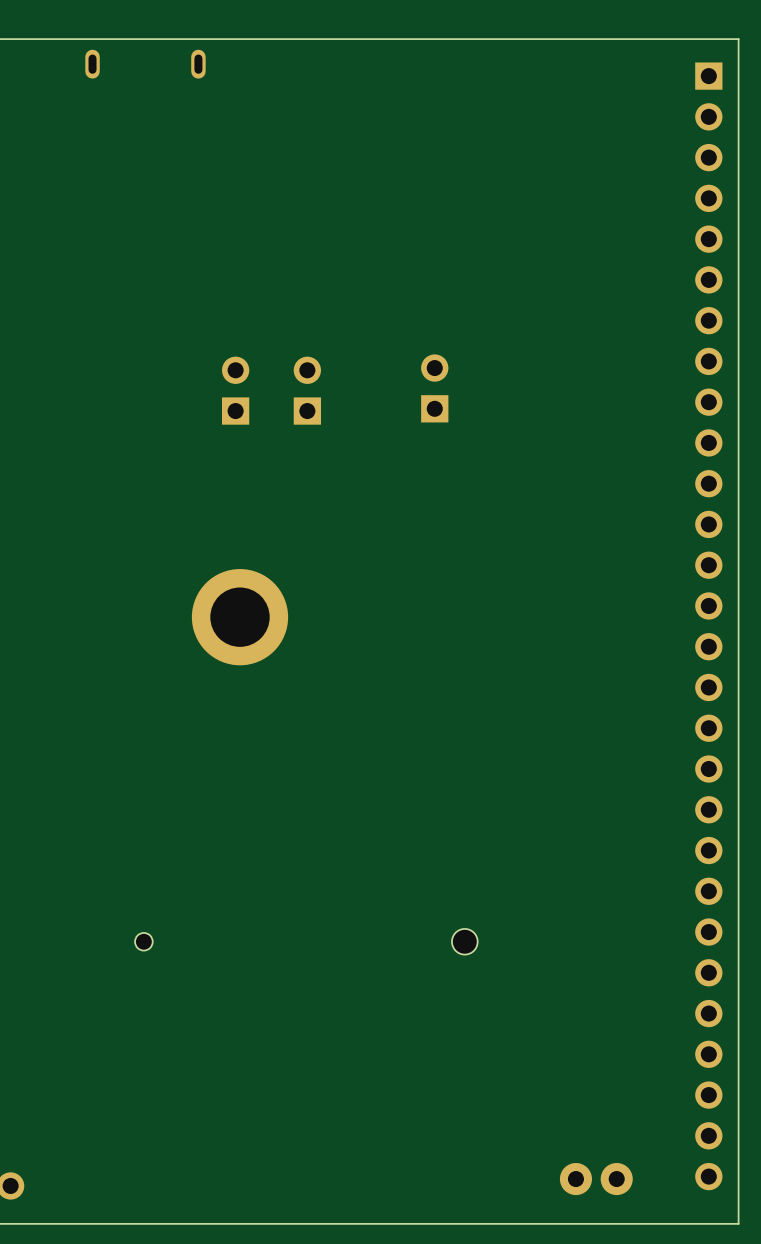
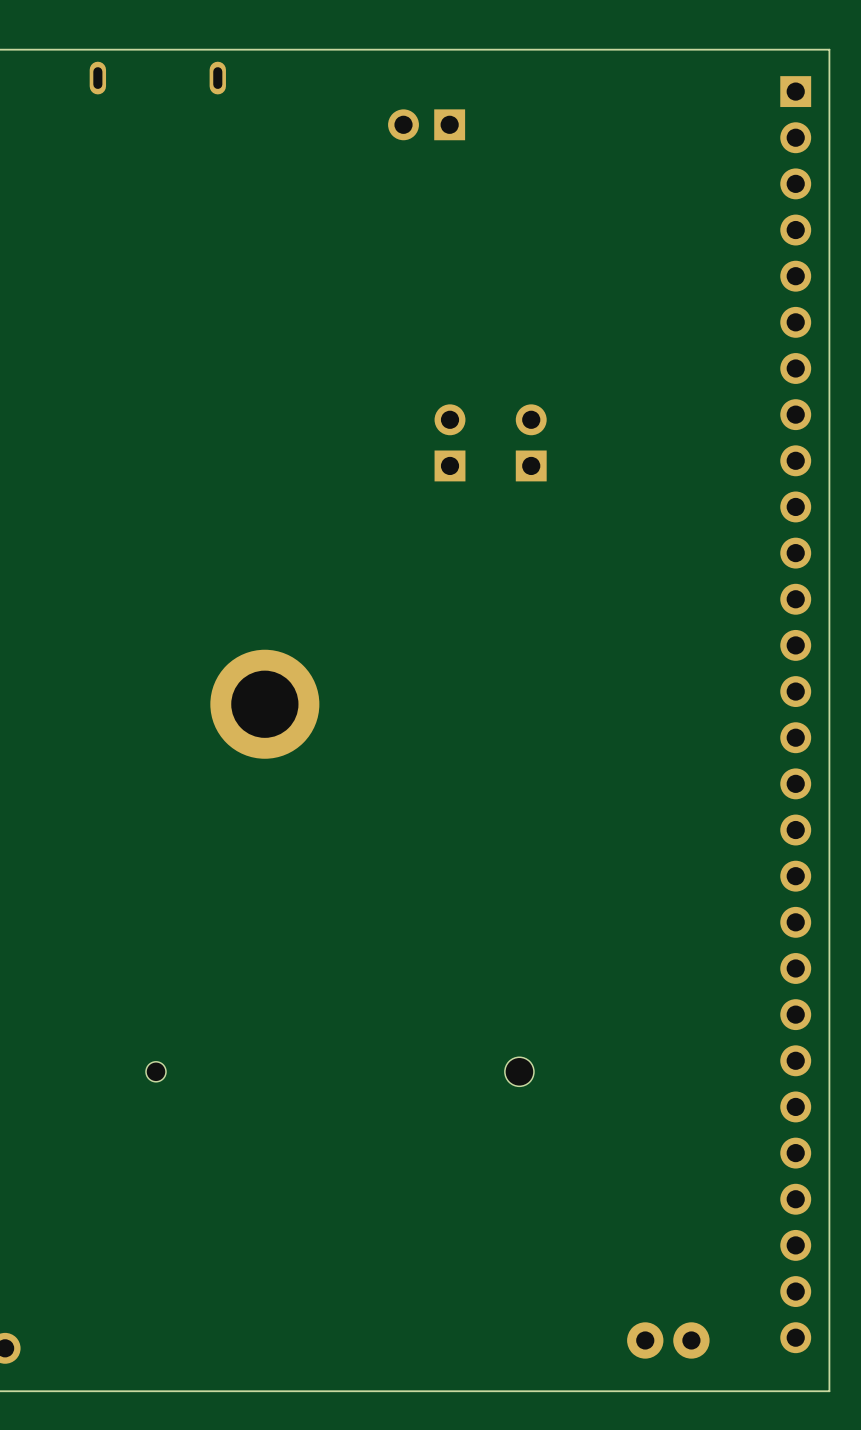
part: none -> (426, 124)
part: none -> (450, 442)
part: none -> (531, 442)
part: (434, 388) -> none
part: (235, 390) -> none
part: (307, 390) -> none

